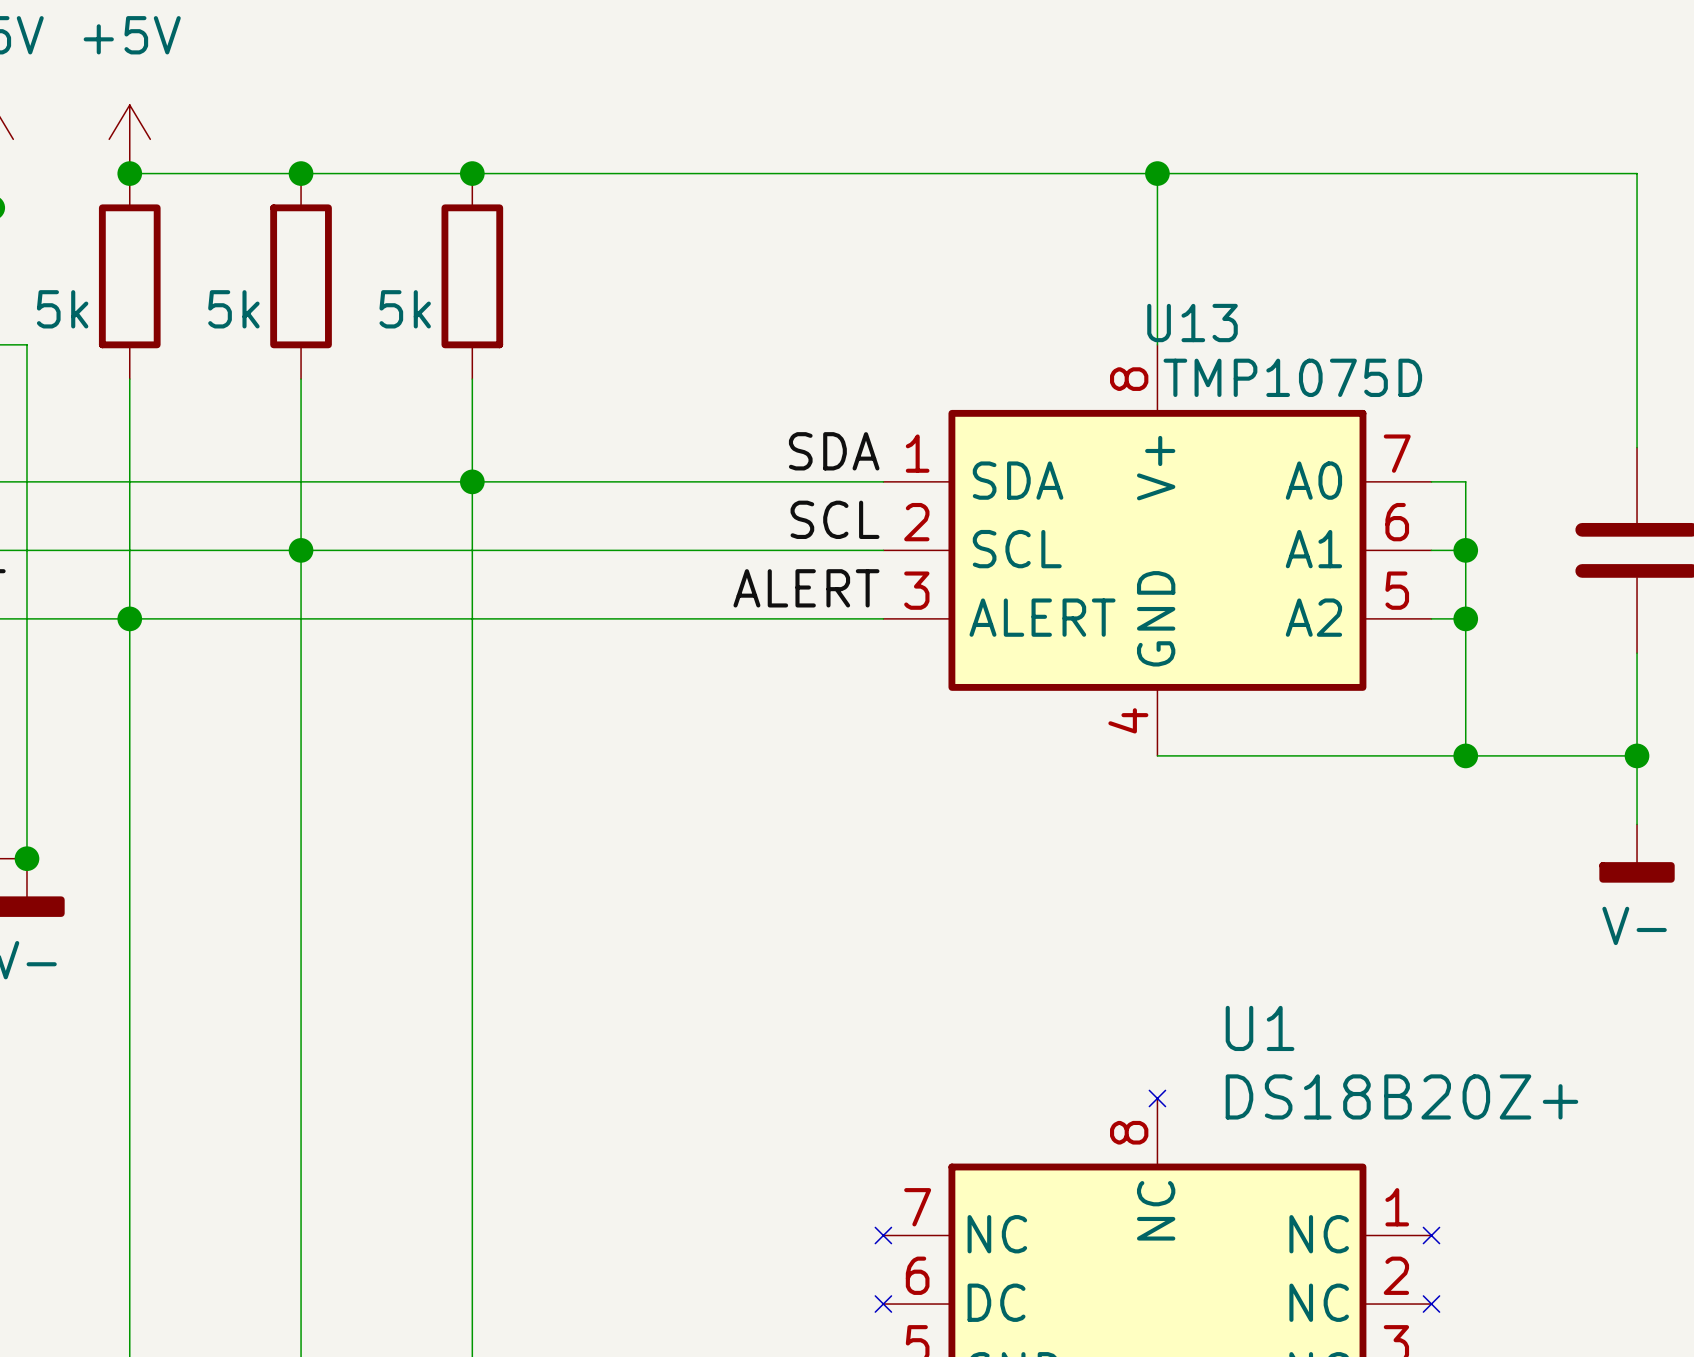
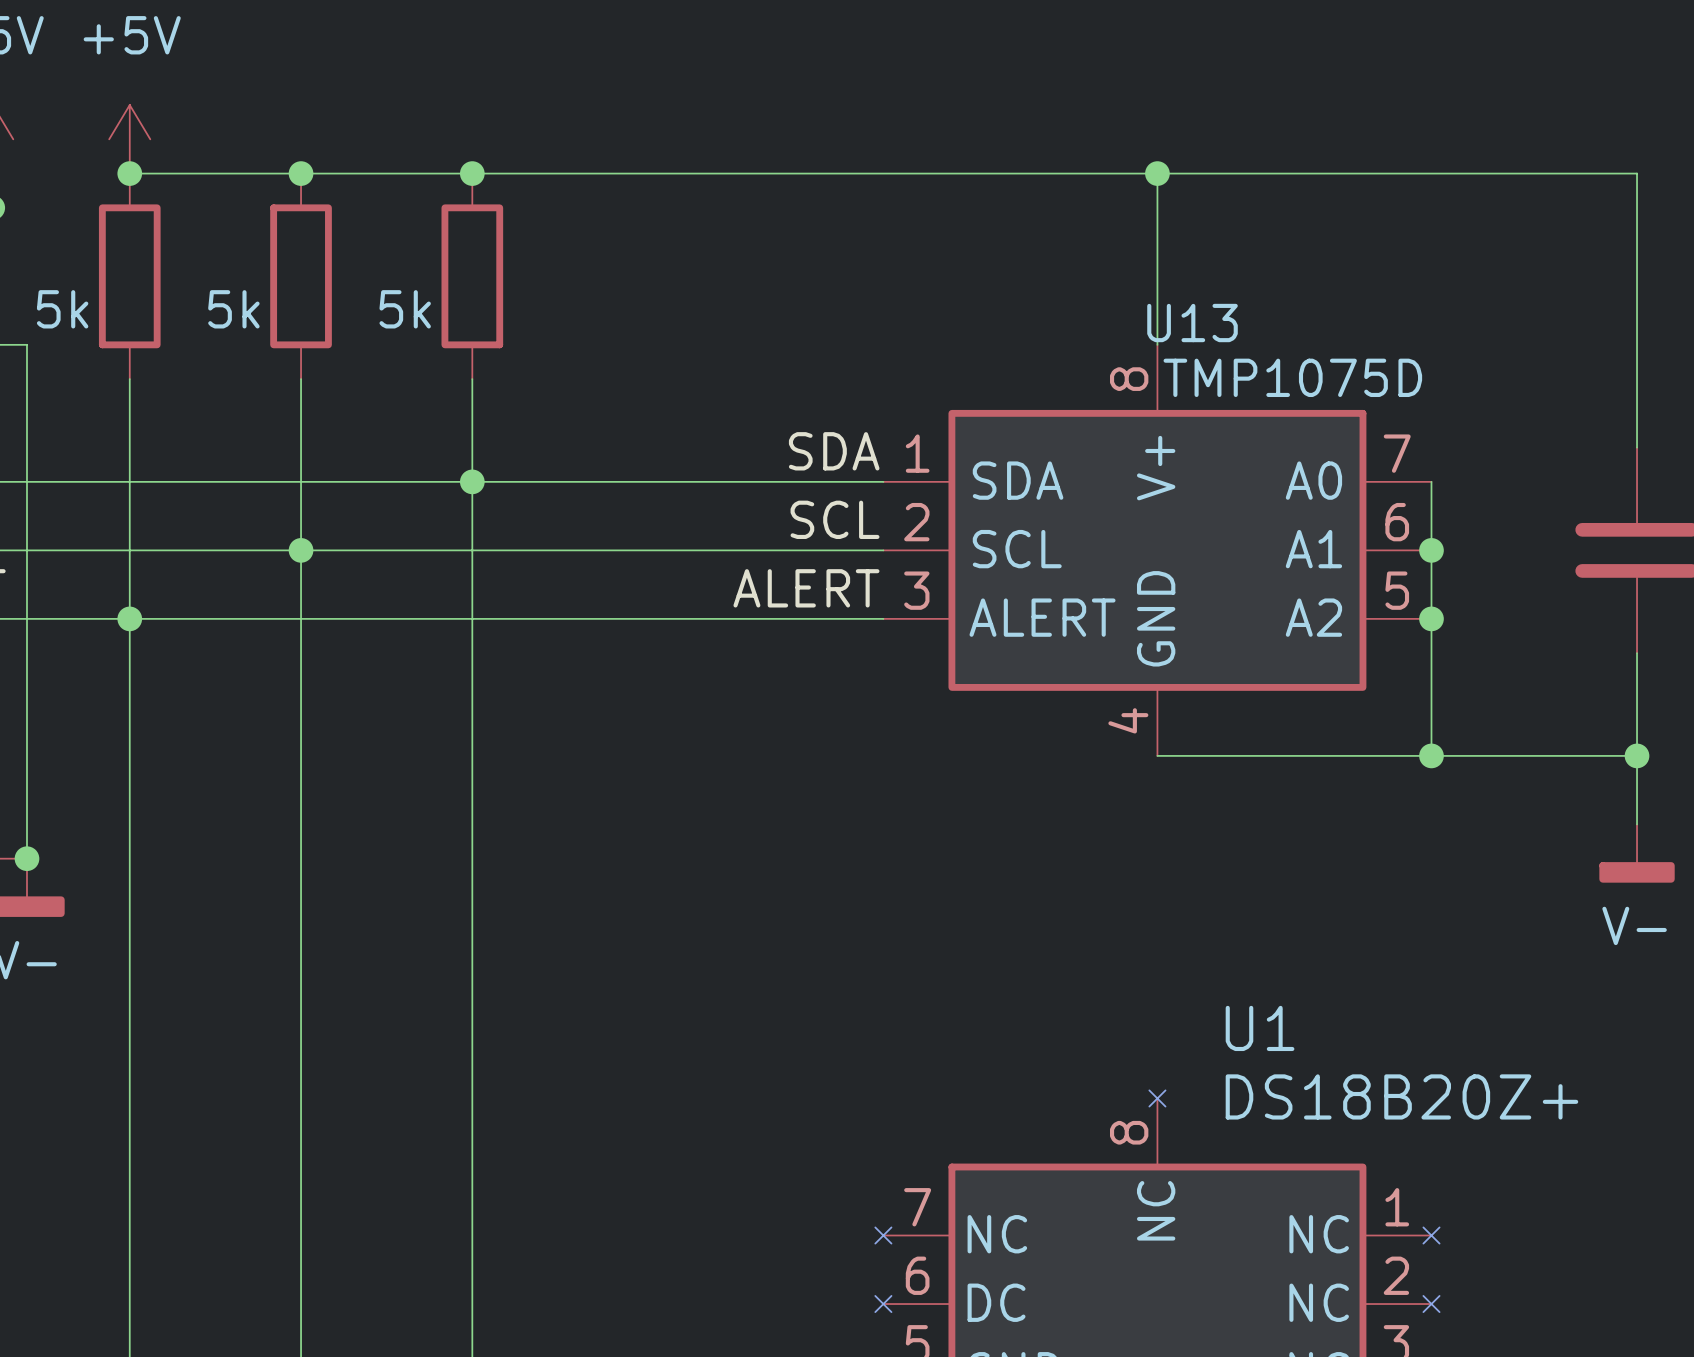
wire: (1431, 481) (1465, 481) (1465, 755) -> (1431, 481) (1431, 755)
wire: (1431, 550) (1465, 550) -> none
junction position: (1465, 550) -> (1431, 550)
wire: (1431, 618) (1465, 618) -> none
junction position: (1465, 618) -> (1431, 618)
junction position: (1465, 755) -> (1431, 755)

